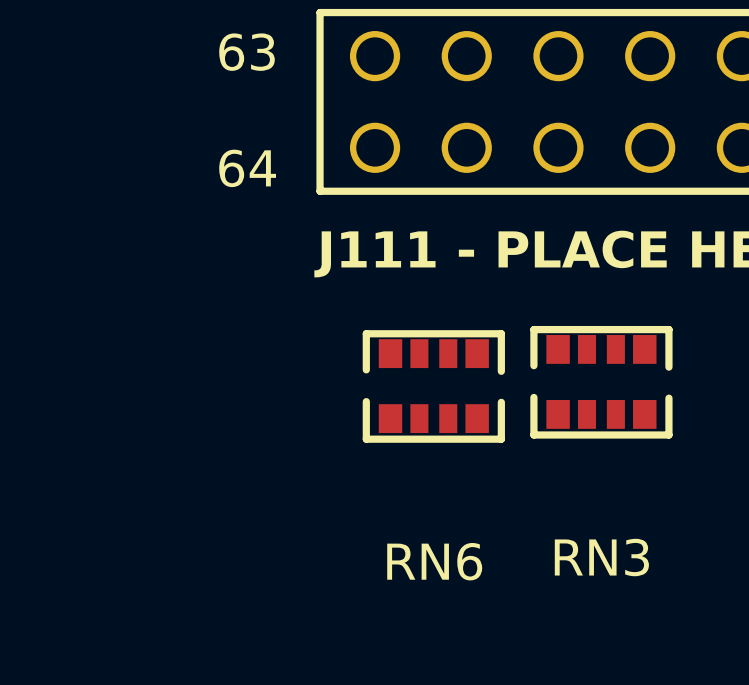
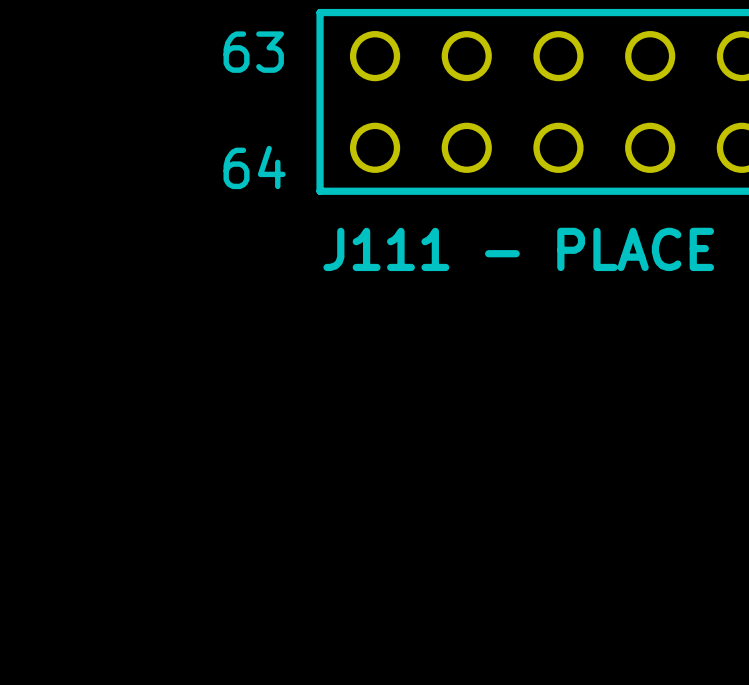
RN3: (601, 382) -> none
RN6: (433, 386) -> none

